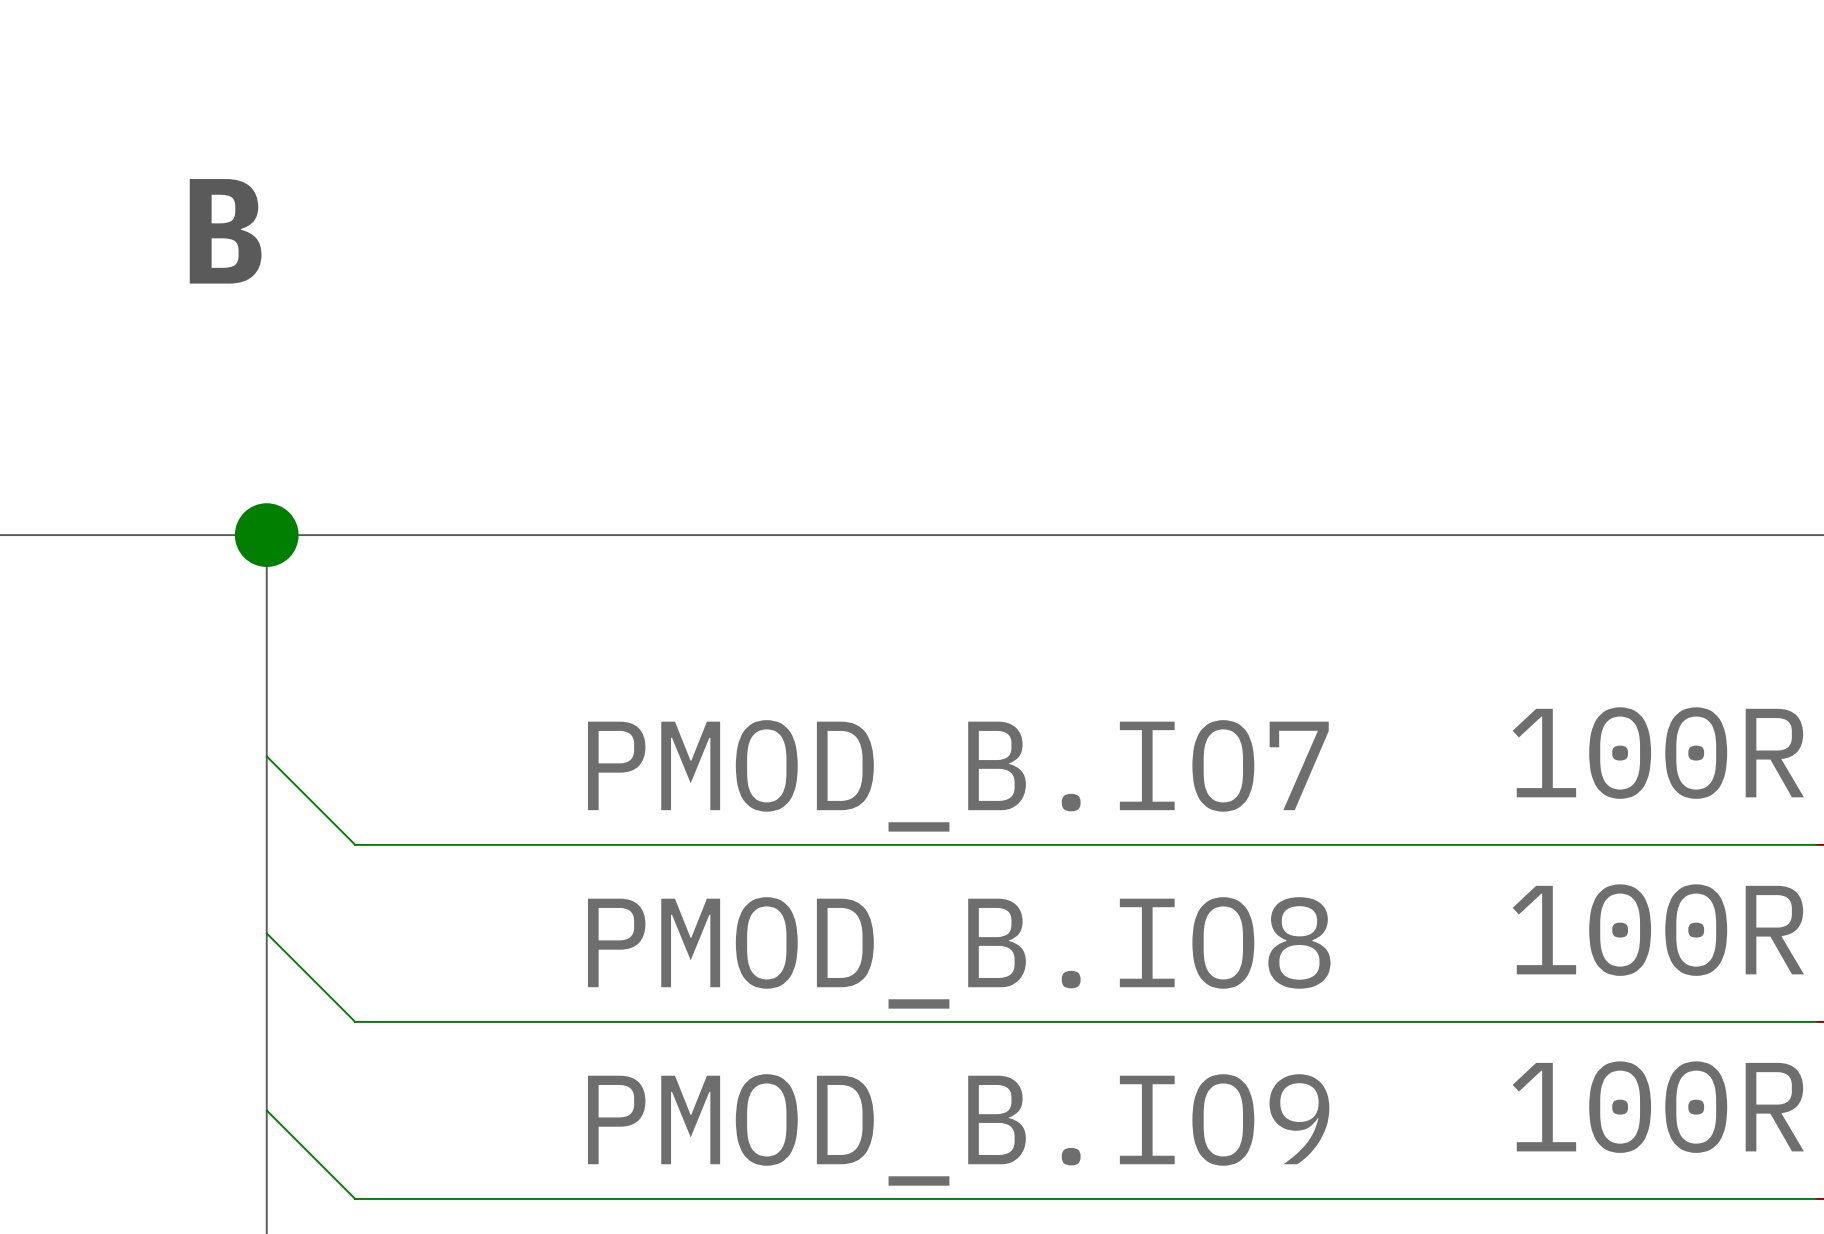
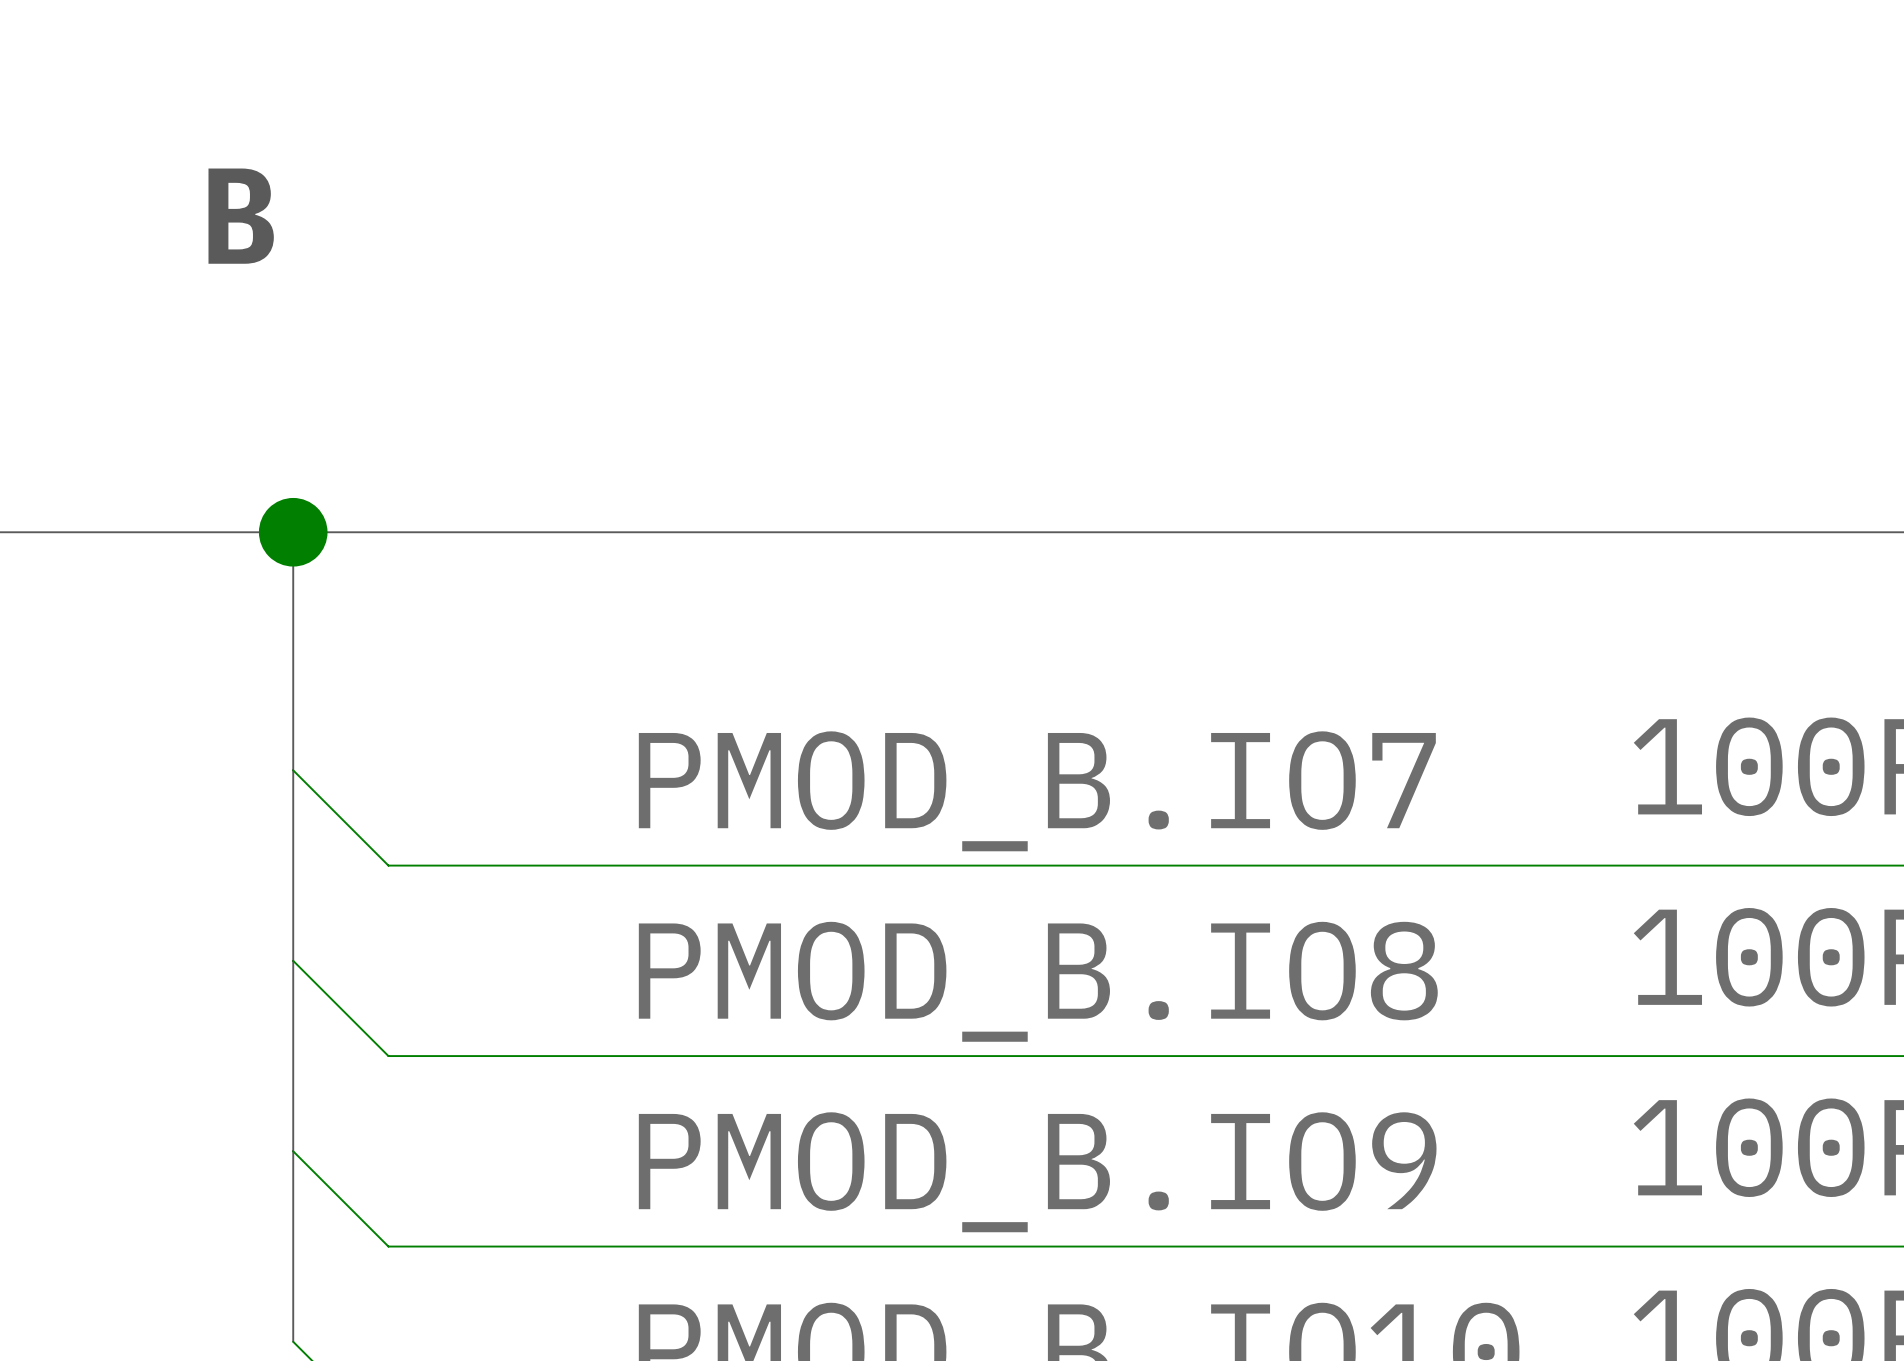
text position: B (225, 231) -> B (241, 216)

